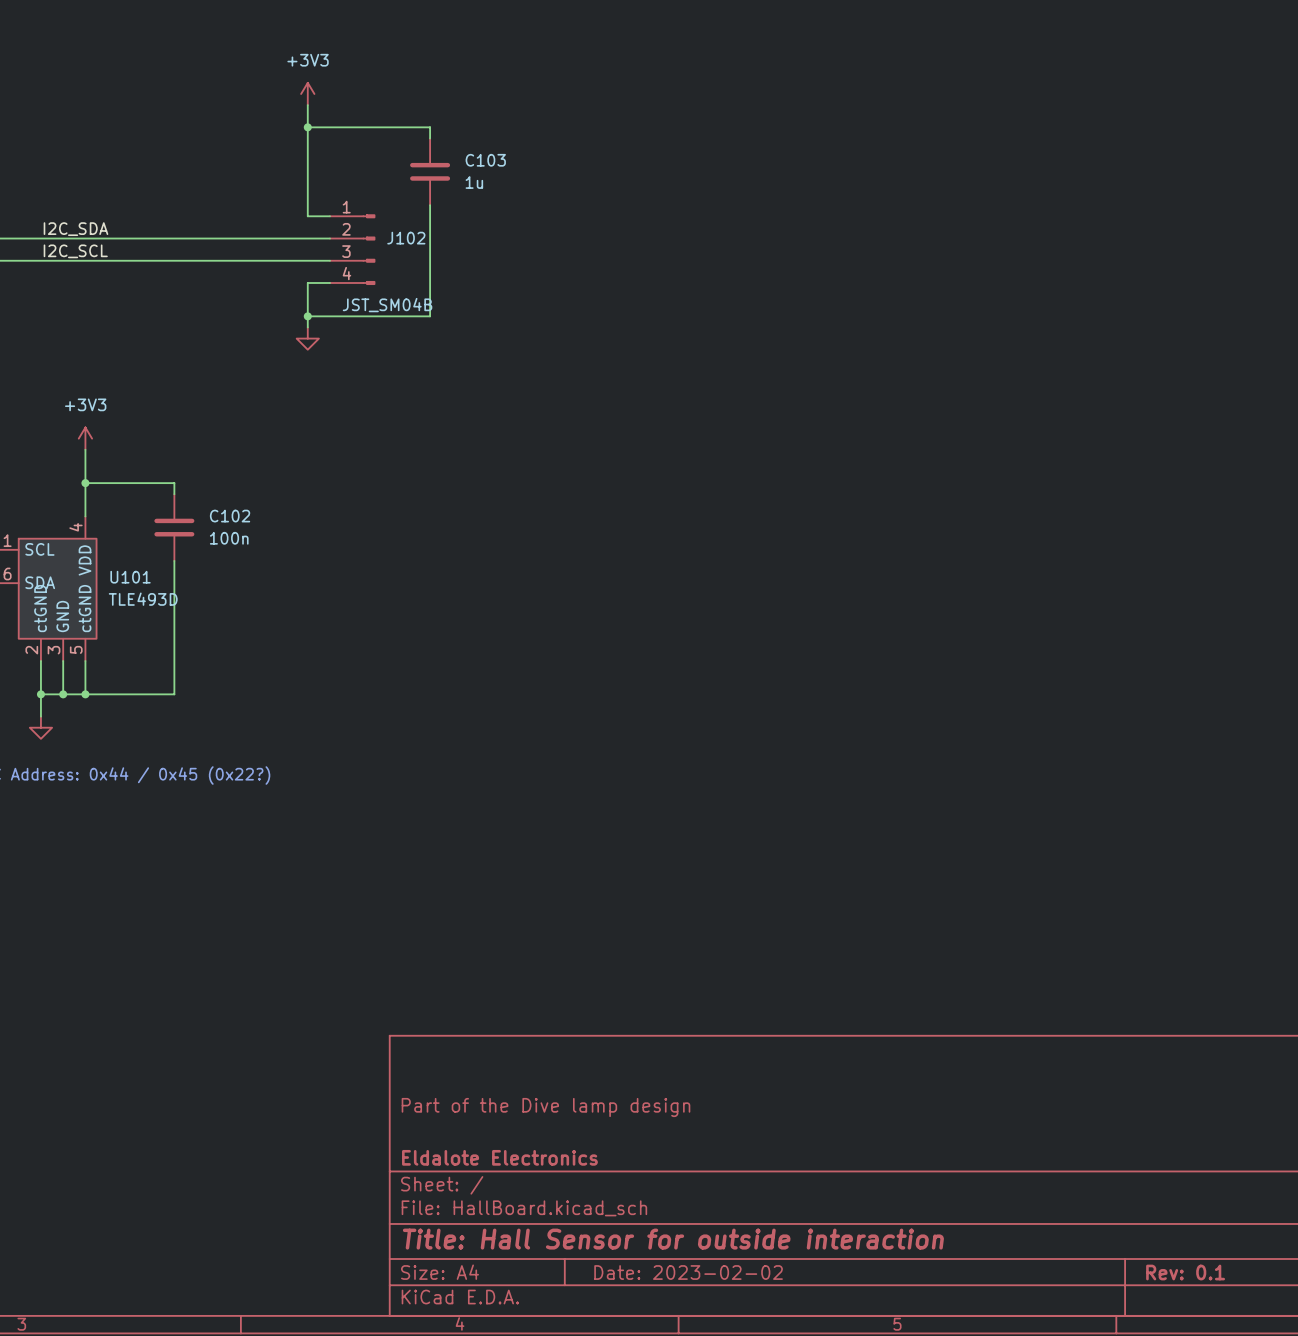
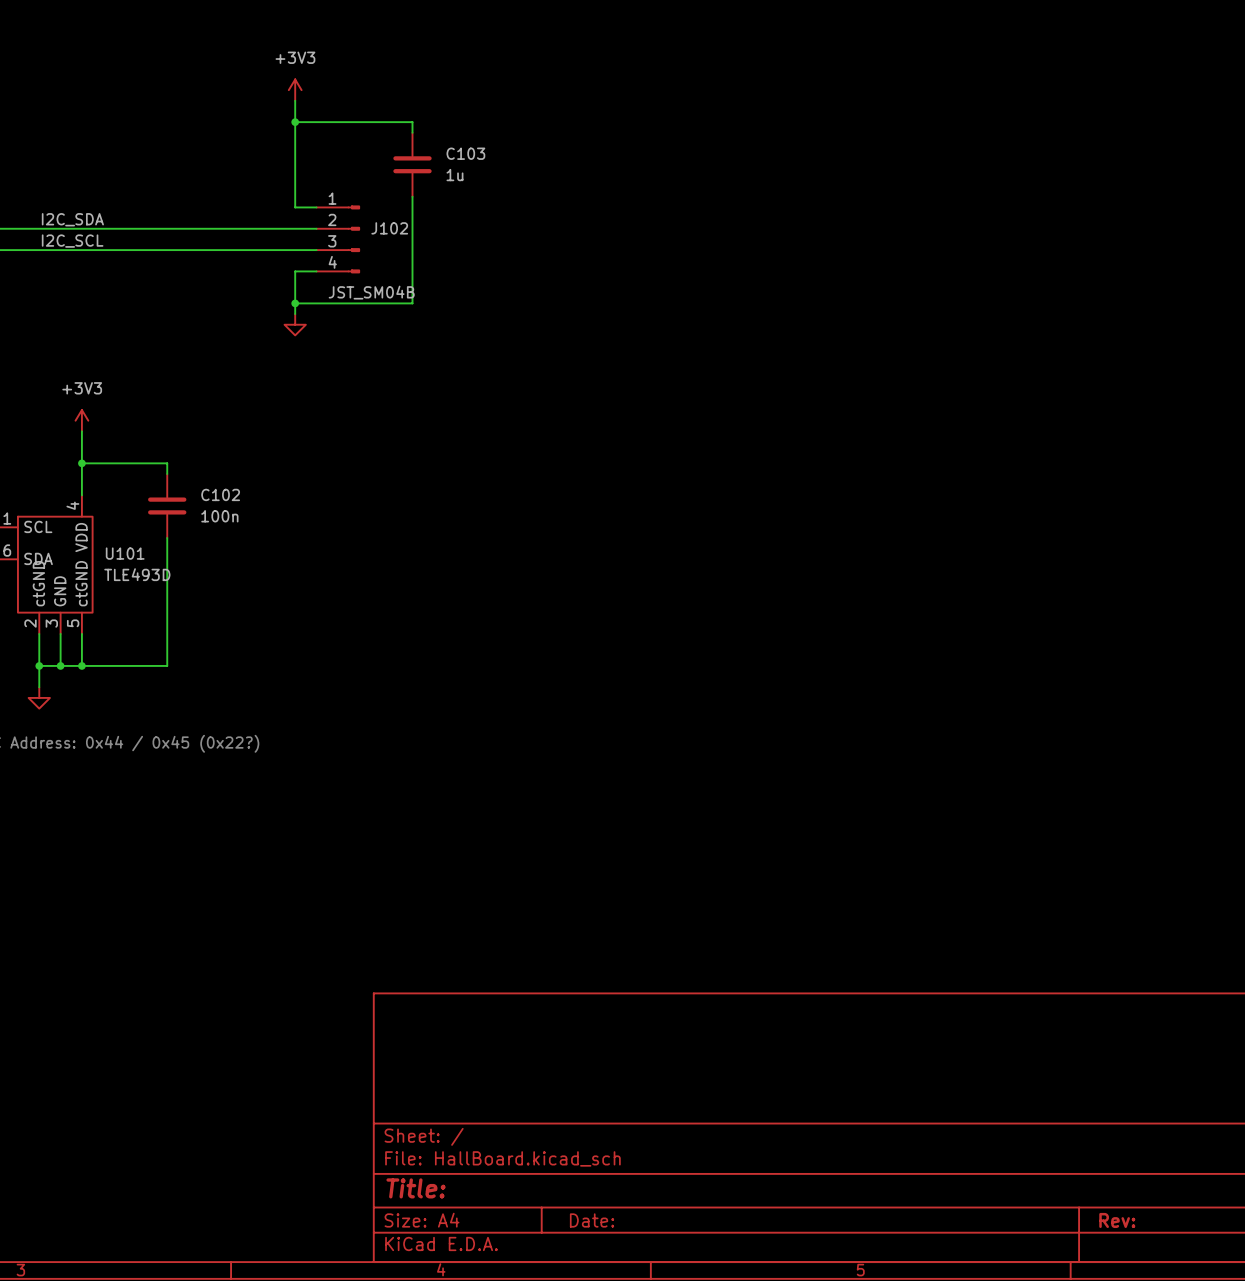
title block: Part of the Dive lamp design (545, 1107) -> none
title block: Eldalote Electronics (499, 1157) -> none
title block: Title: Hall Sensor for outside interaction (673, 1239) -> Title: (416, 1188)
title block: Date: 2023-02-02 (688, 1272) -> Date: (592, 1220)
title block: Rev: 0.1 (1185, 1272) -> Rev: (1117, 1220)

